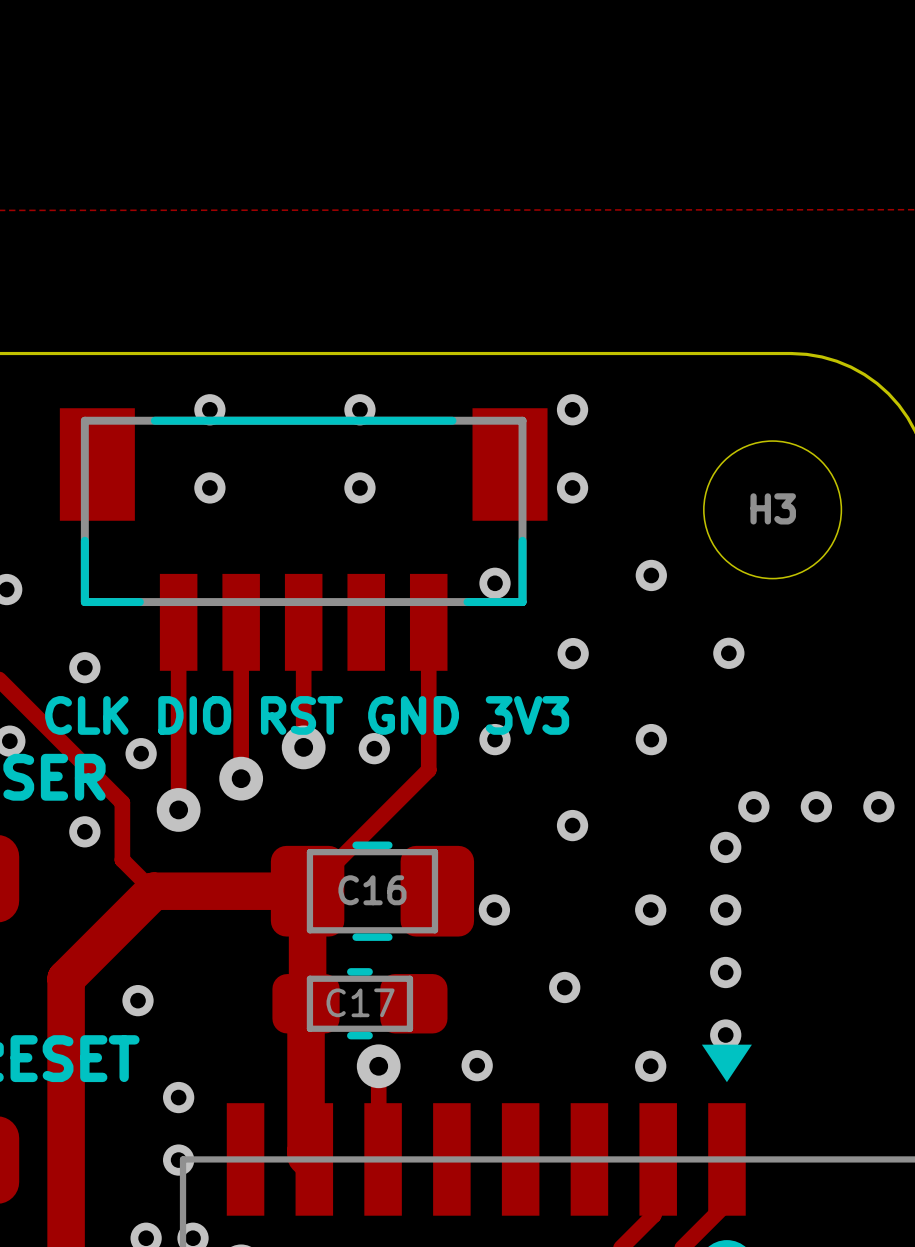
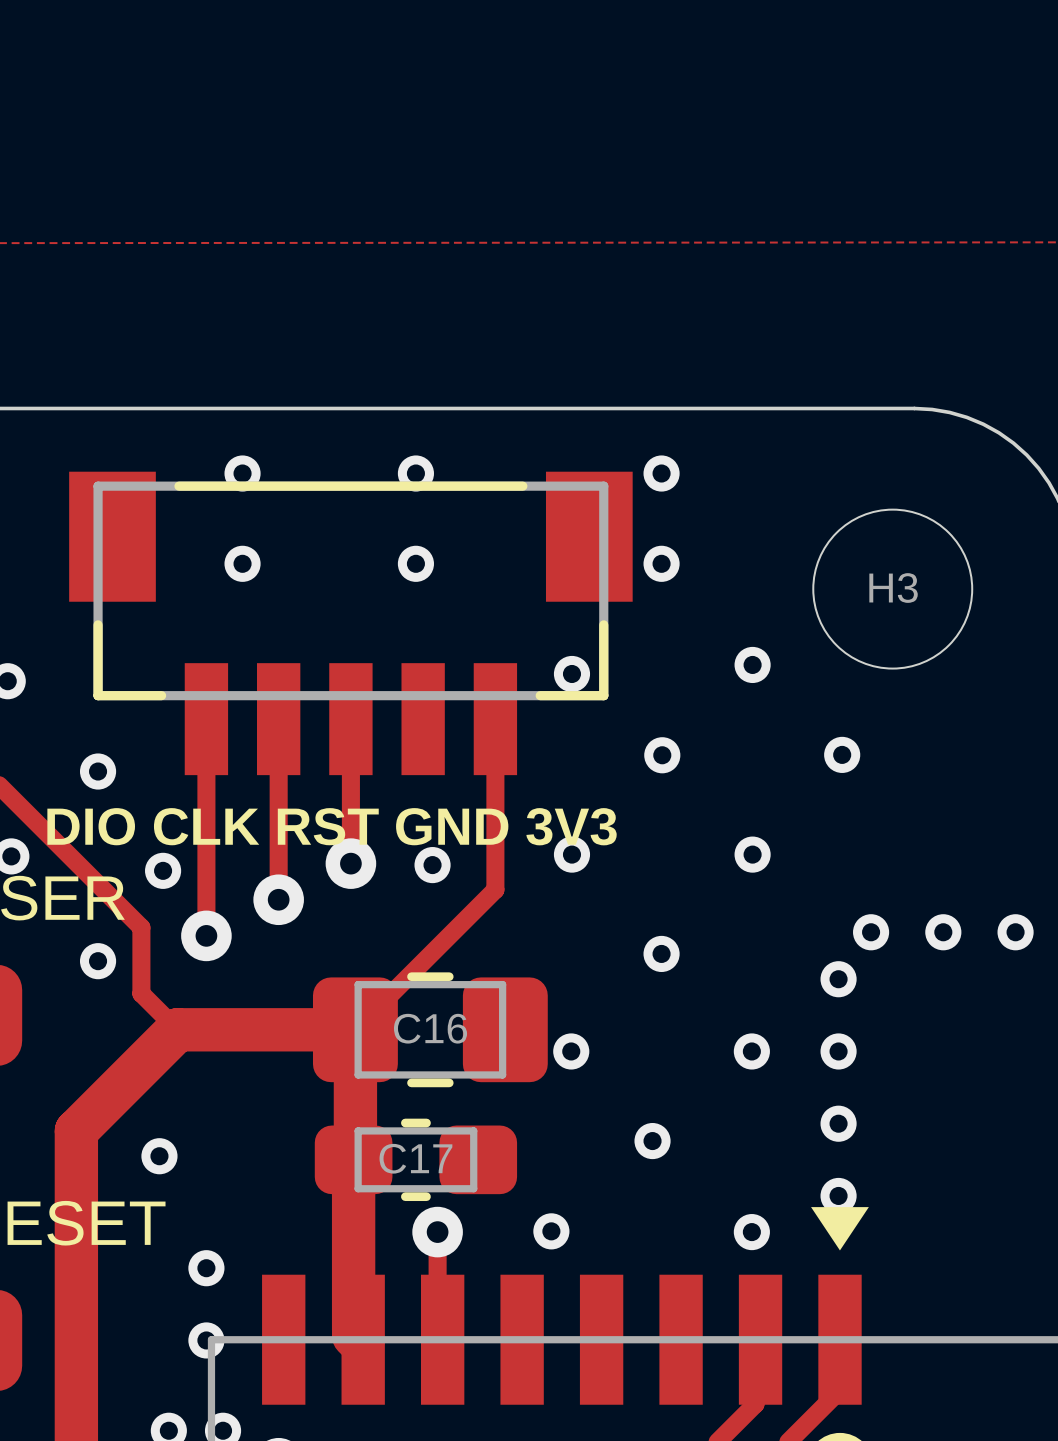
text: CLK DIO RST GND 3V3 (307, 715) -> DIO CLK RST GND 3V3 (332, 826)

